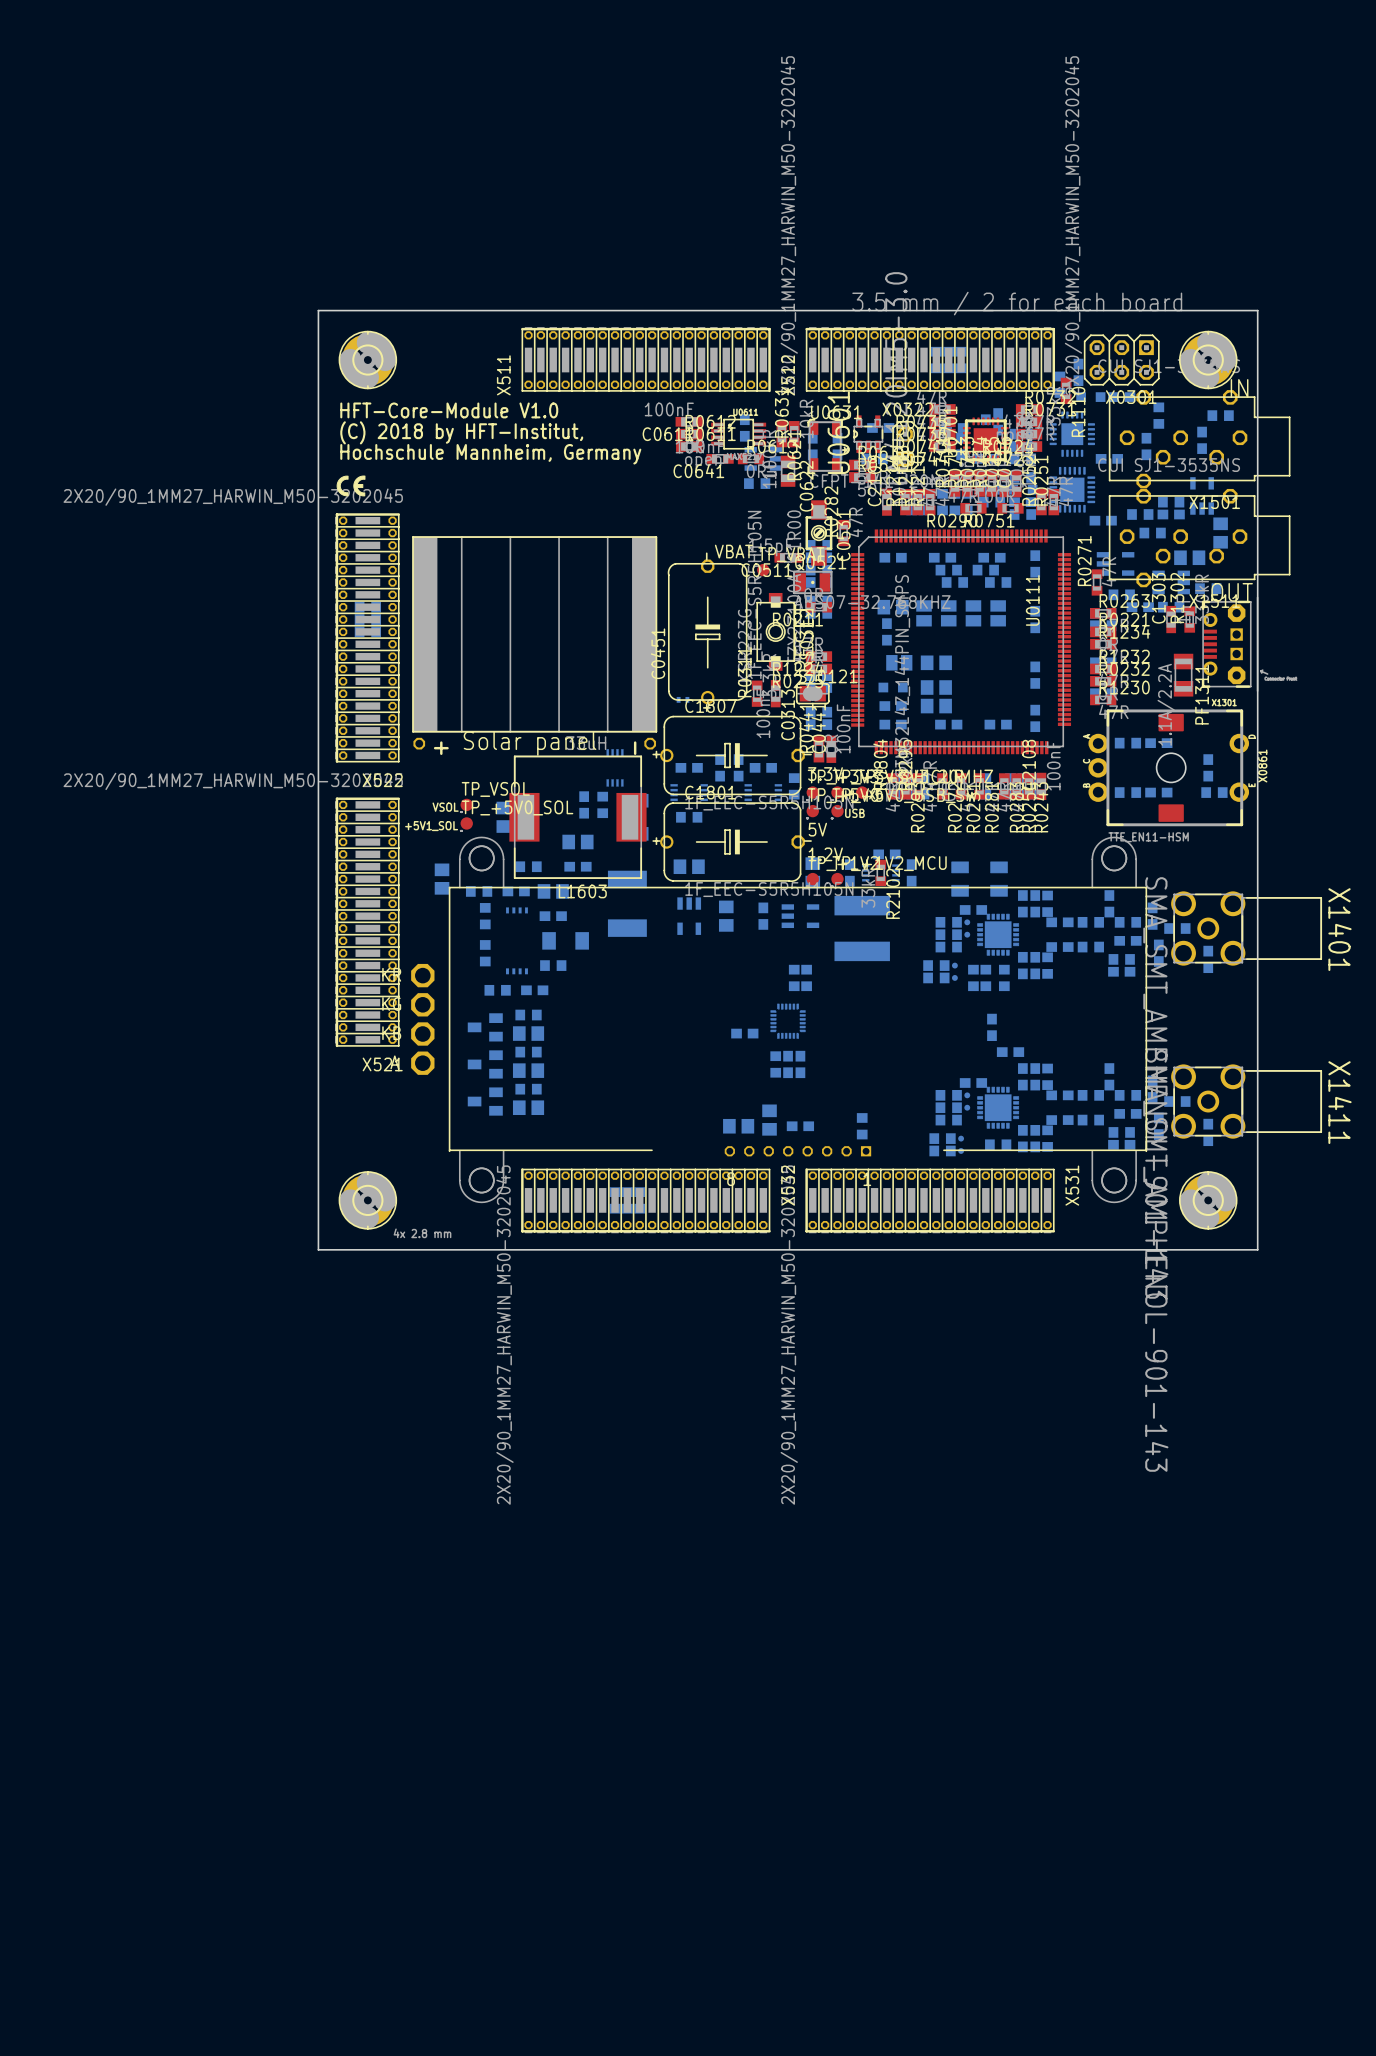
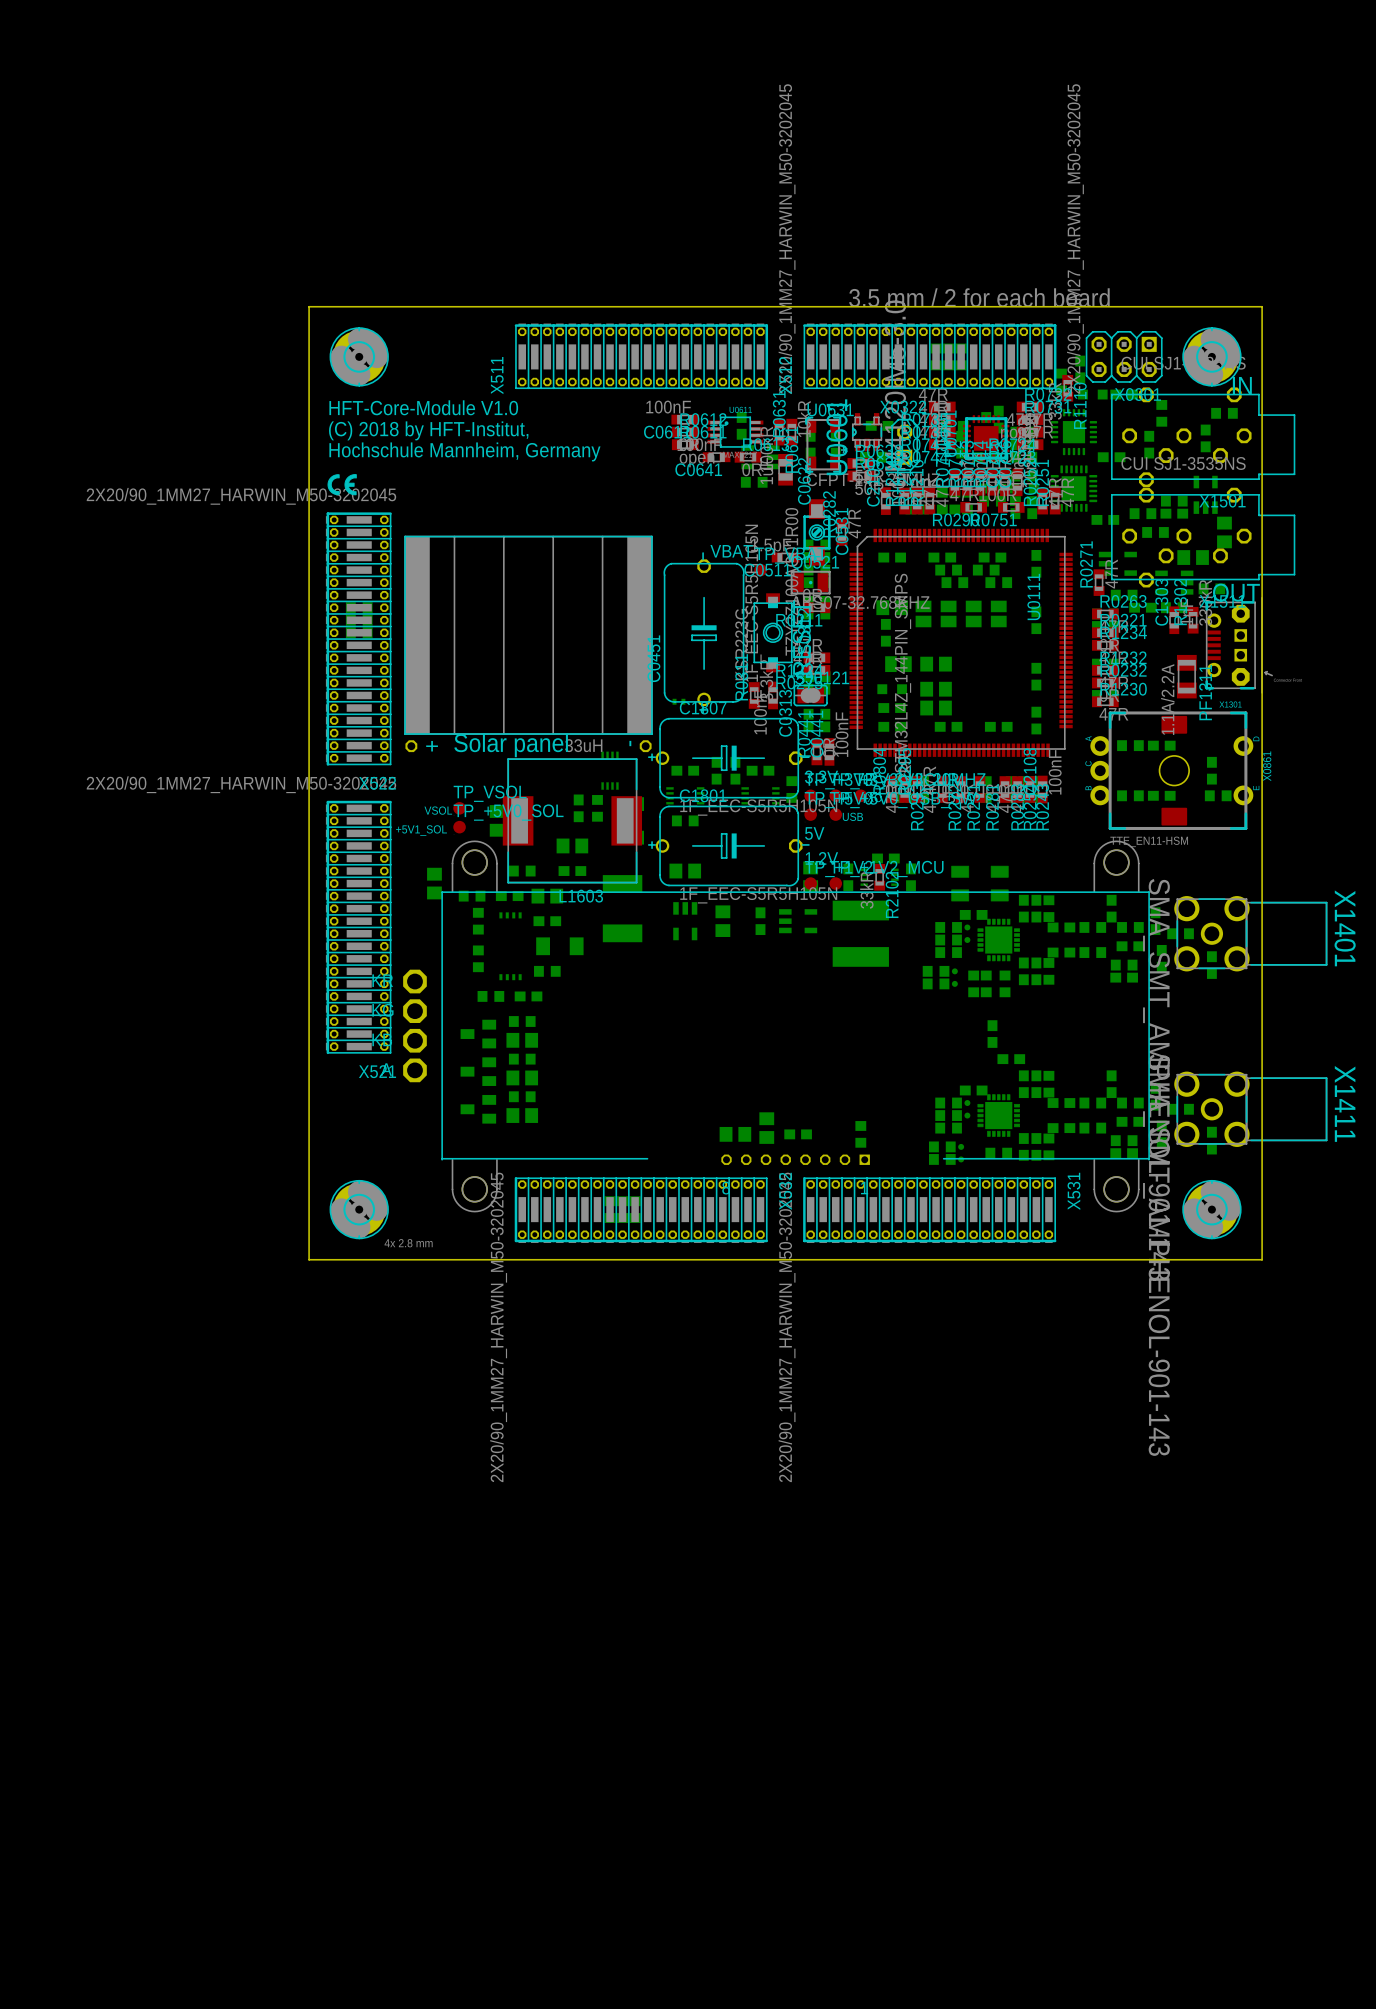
part: (794, 977) -> none
part: (806, 977) -> none
part: (788, 1021) -> none
part: (744, 1033) -> none
part: (775, 1064) -> none
part: (788, 1064) -> none
part: (800, 1064) -> none

